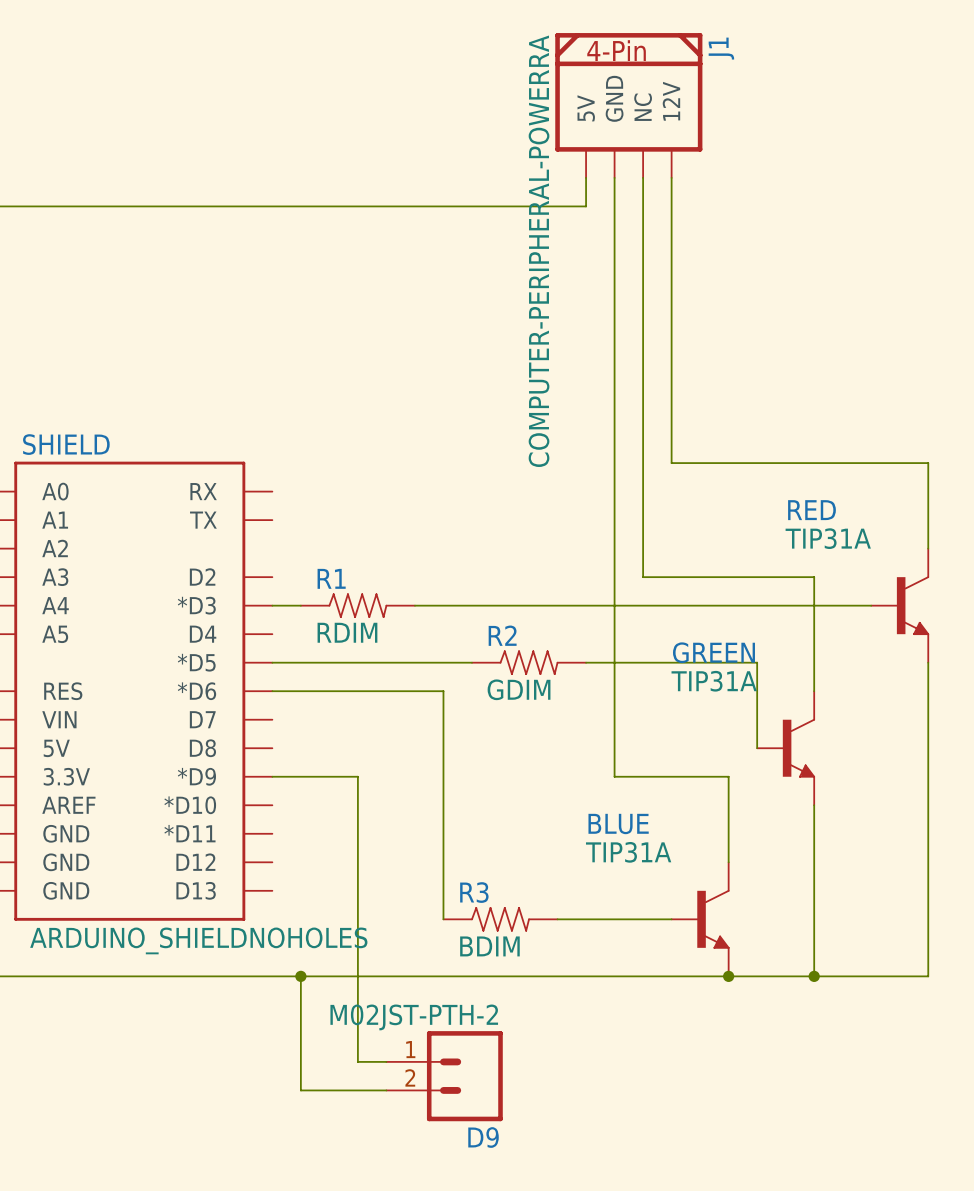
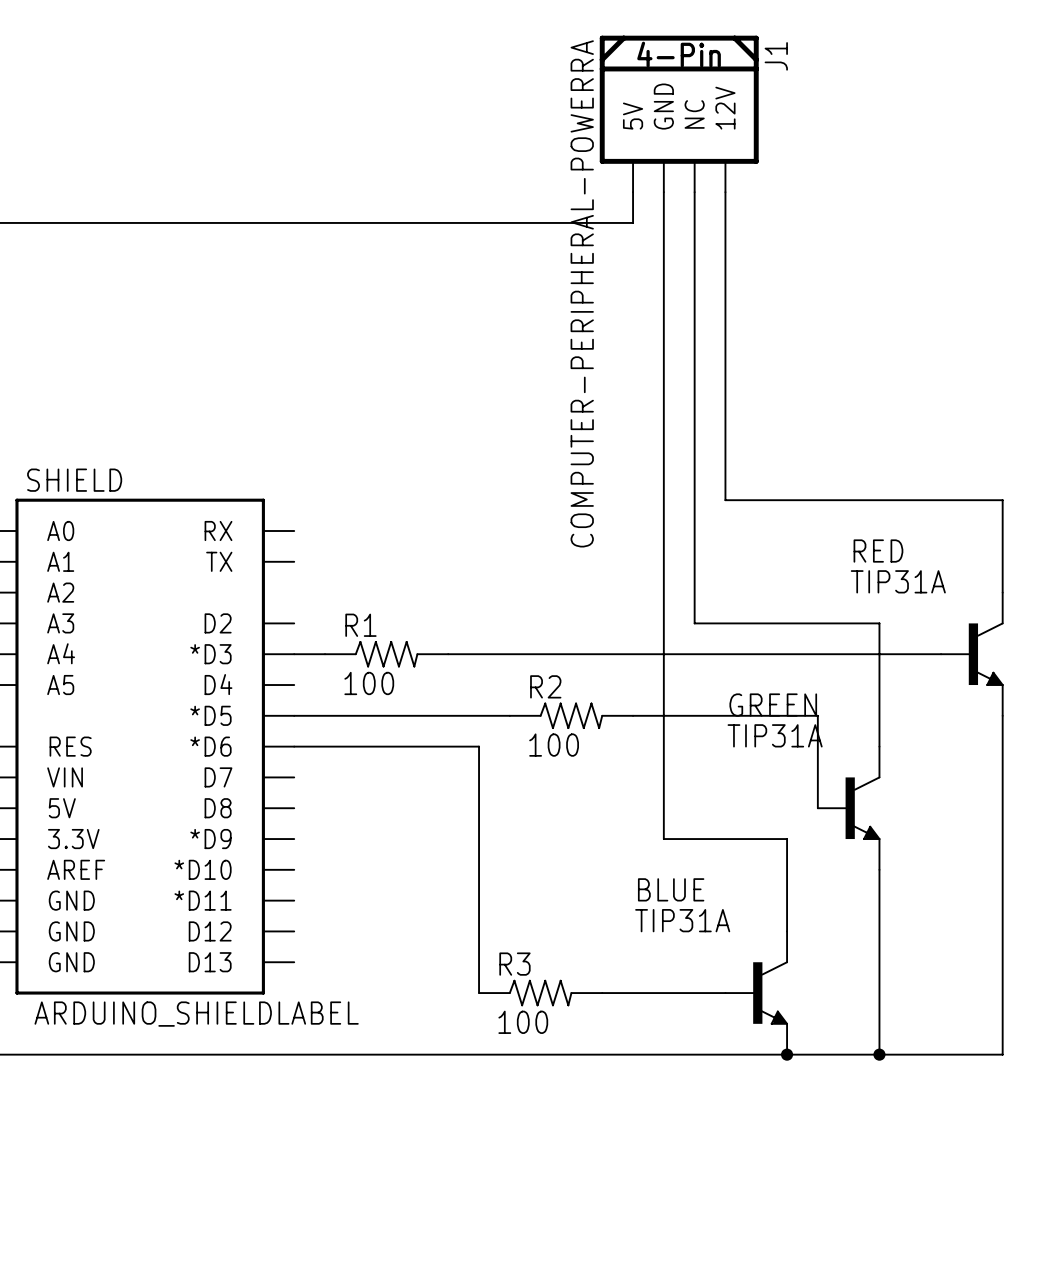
R1 value: RDIM (347, 632) -> 100 (369, 683)
R2 value: GDIM (519, 689) -> 100 (554, 745)
wire: (272, 776) (357, 776) (357, 1061) (386, 1061) -> none
SHIELD value: ARDUINO_SHIELDNOHOLES (198, 940) -> ARDUINO_SHIELDLABEL (196, 1014)
R3 value: BDIM (489, 946) -> 100 (523, 1022)
wire: (300, 976) (300, 1090) (386, 1090) -> none
junction: (300, 976) -> none
D9: M02JST-PTH-2 (444, 1076) -> none

